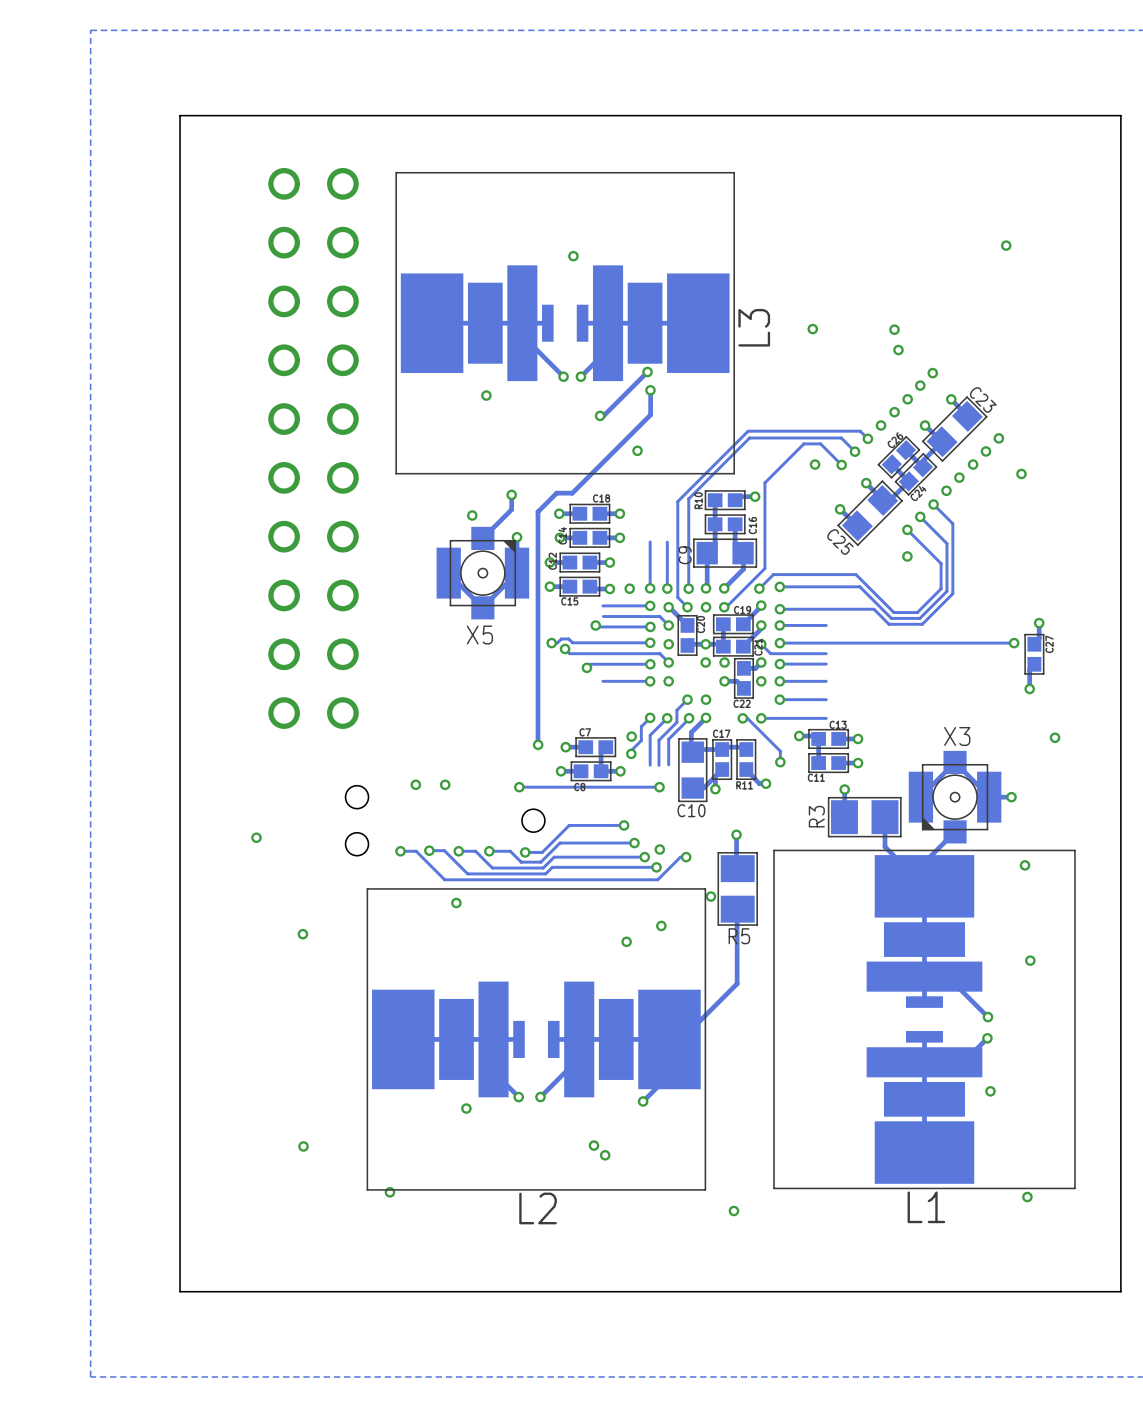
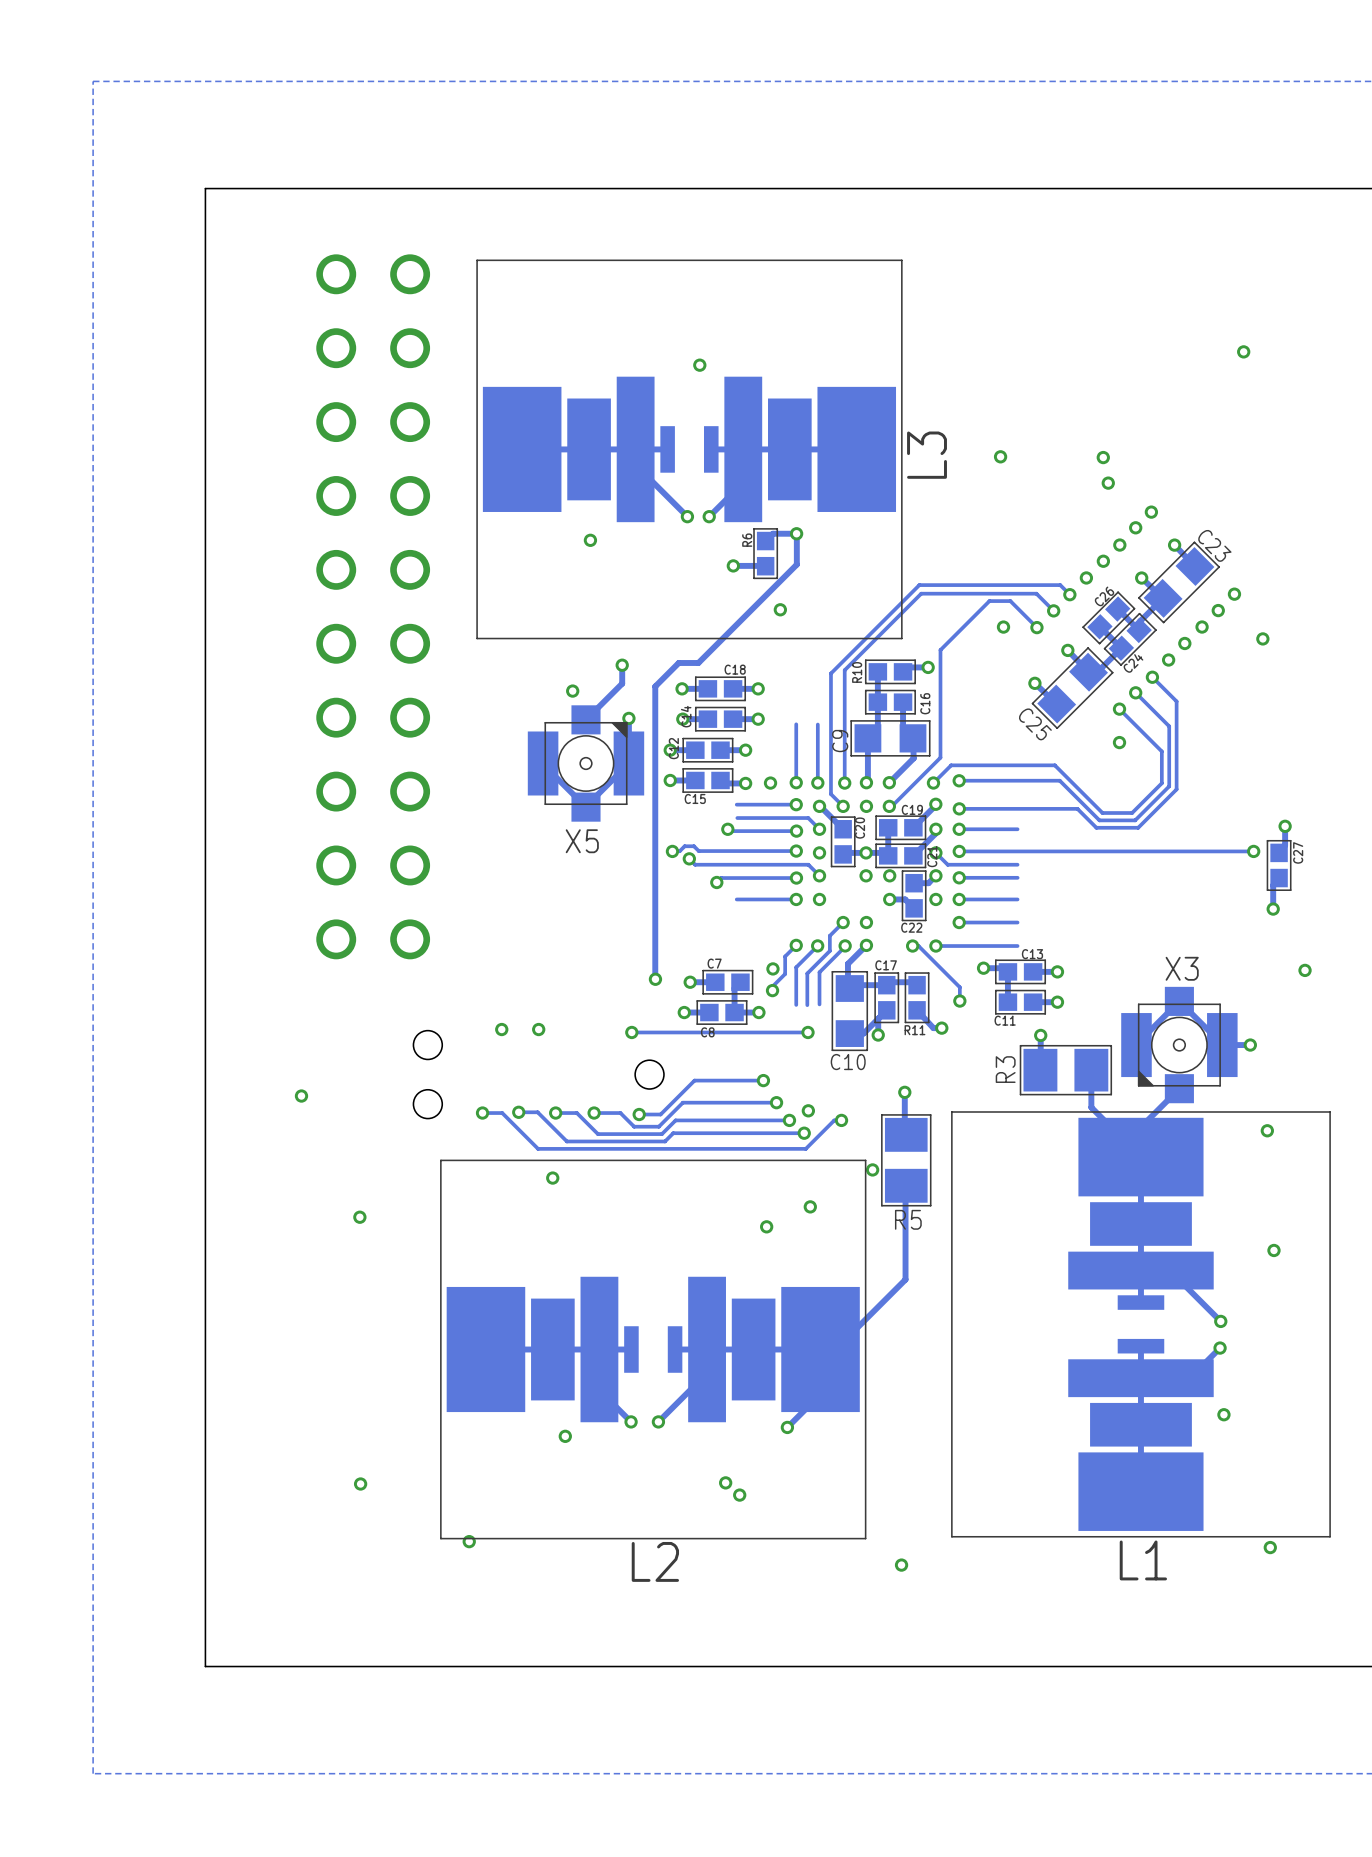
track: (647, 372) (603, 415) -> (765, 565) (737, 565)
via: (647, 372) -> none
track: none -> (796, 533) (772, 533) (765, 541)
R6: none -> (765, 553)

